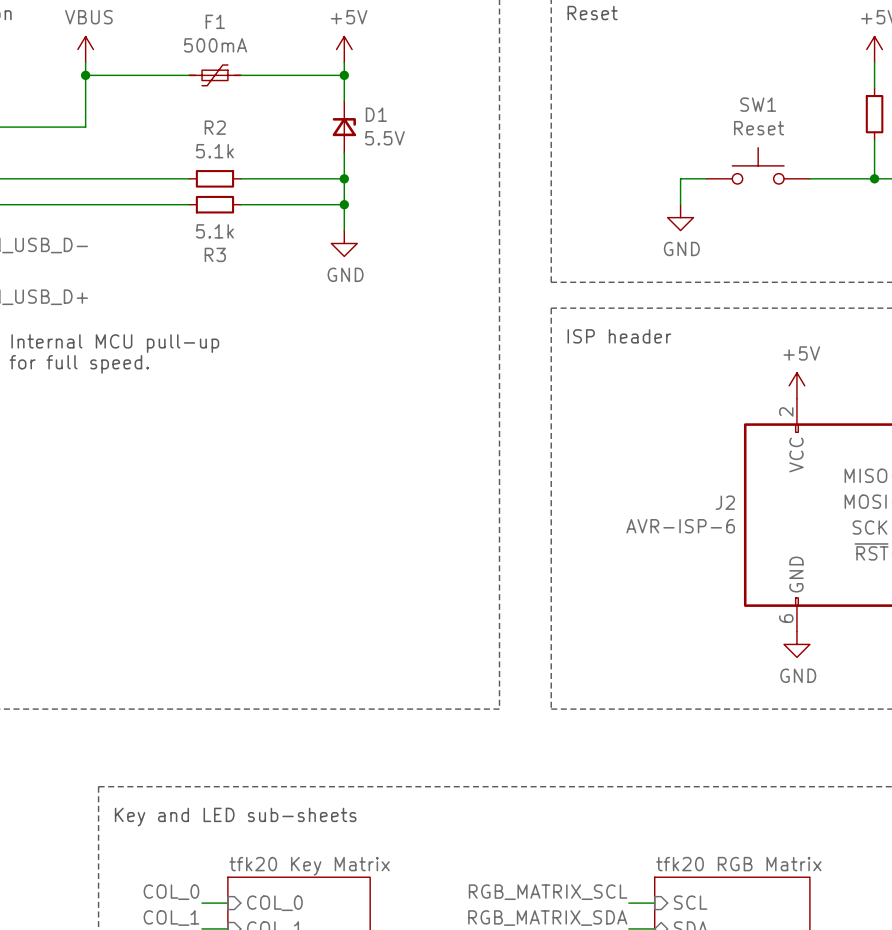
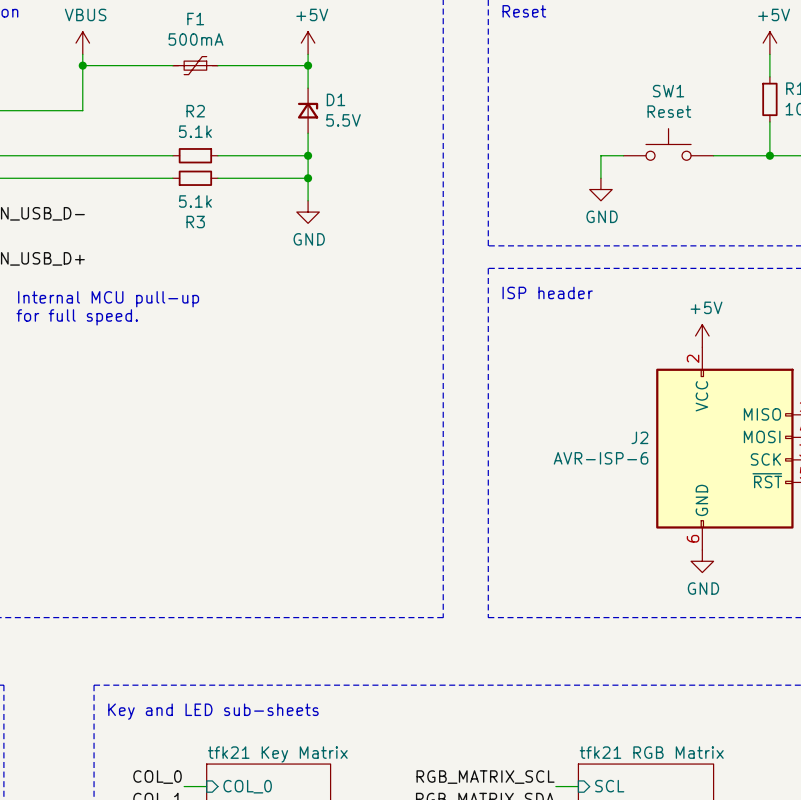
sheet tfk20 RGB Matrix name: tfk20 RGB Matrix (738, 864) -> tfk21 RGB Matrix (651, 752)
sheet tfk20 Key Matrix name: tfk20 Key Matrix (309, 866) -> tfk21 Key Matrix (277, 754)

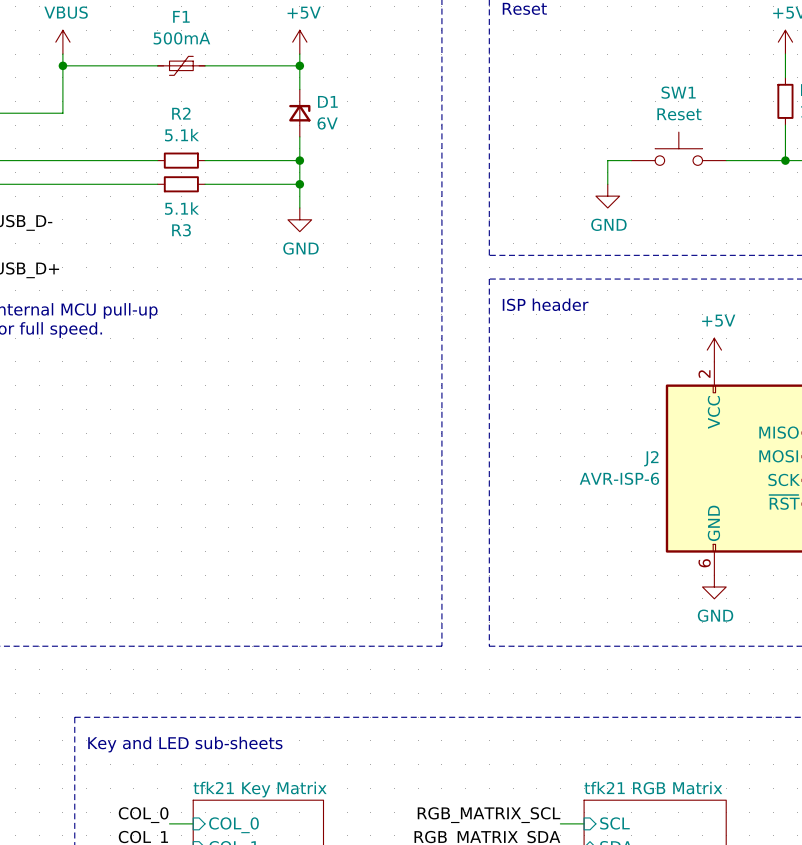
D1 value: 5.5V (343, 120) -> 6V (327, 123)

